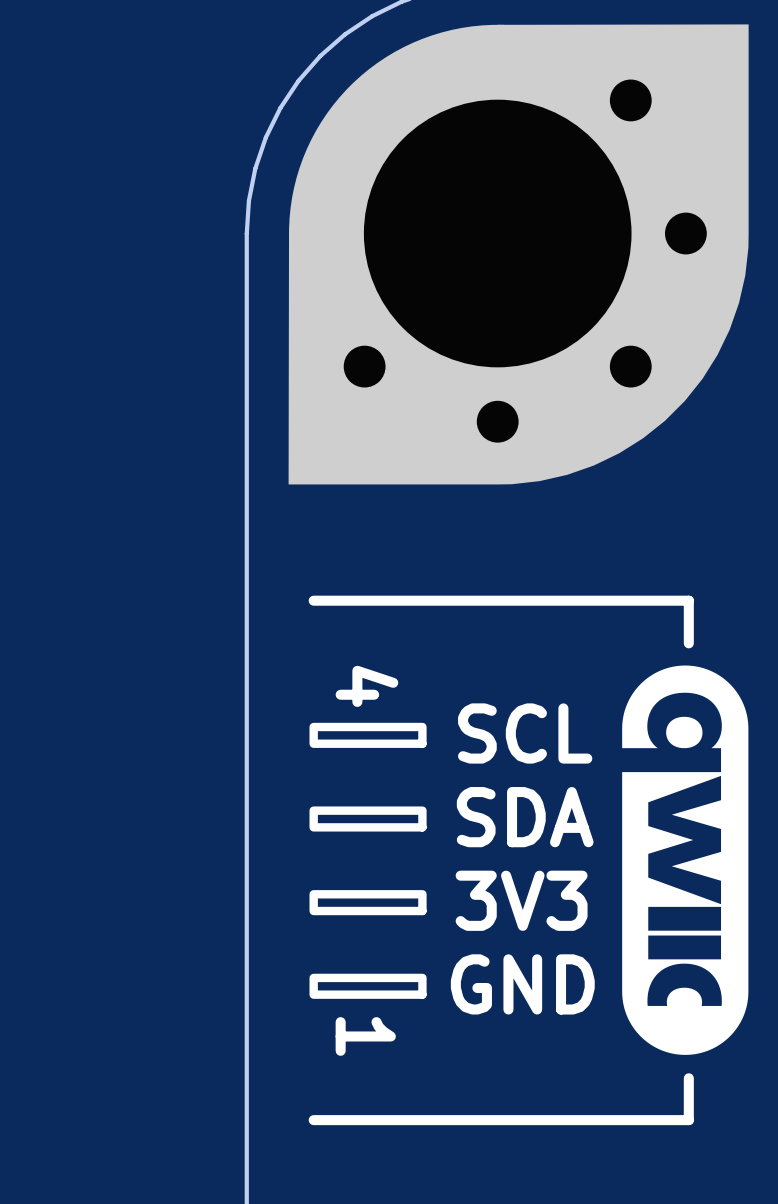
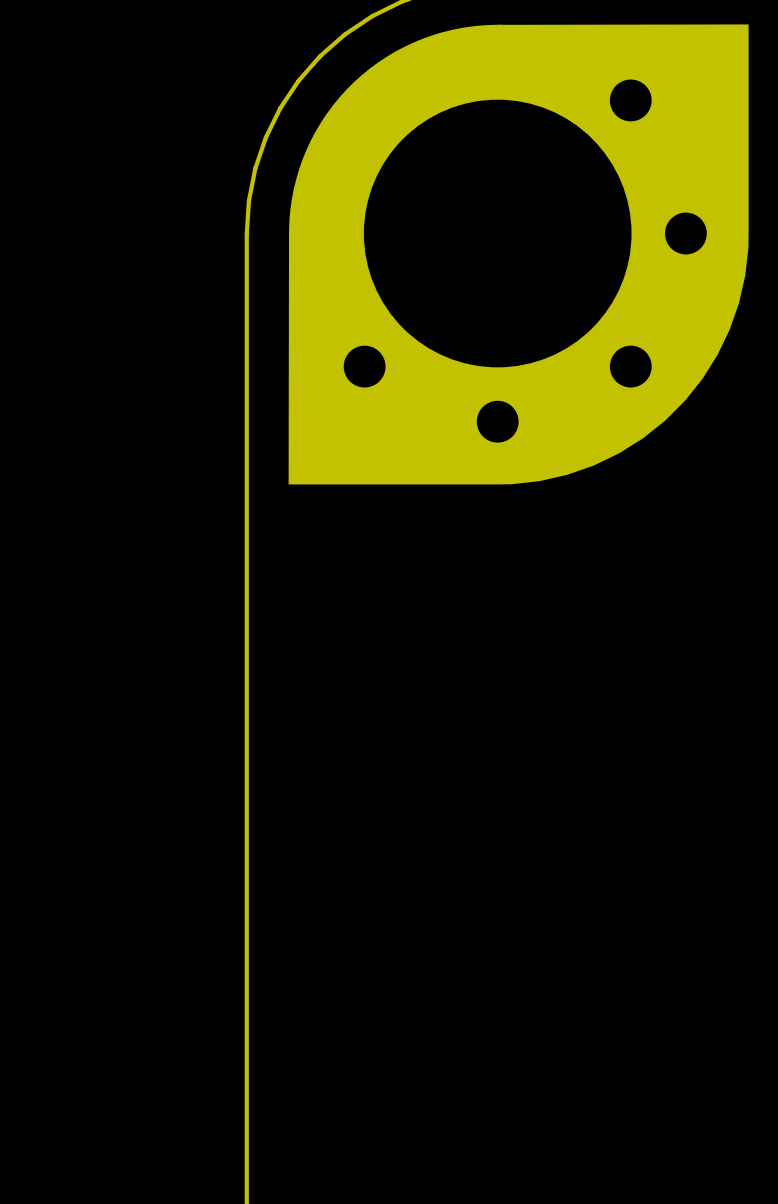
part: (528, 860) -> none

